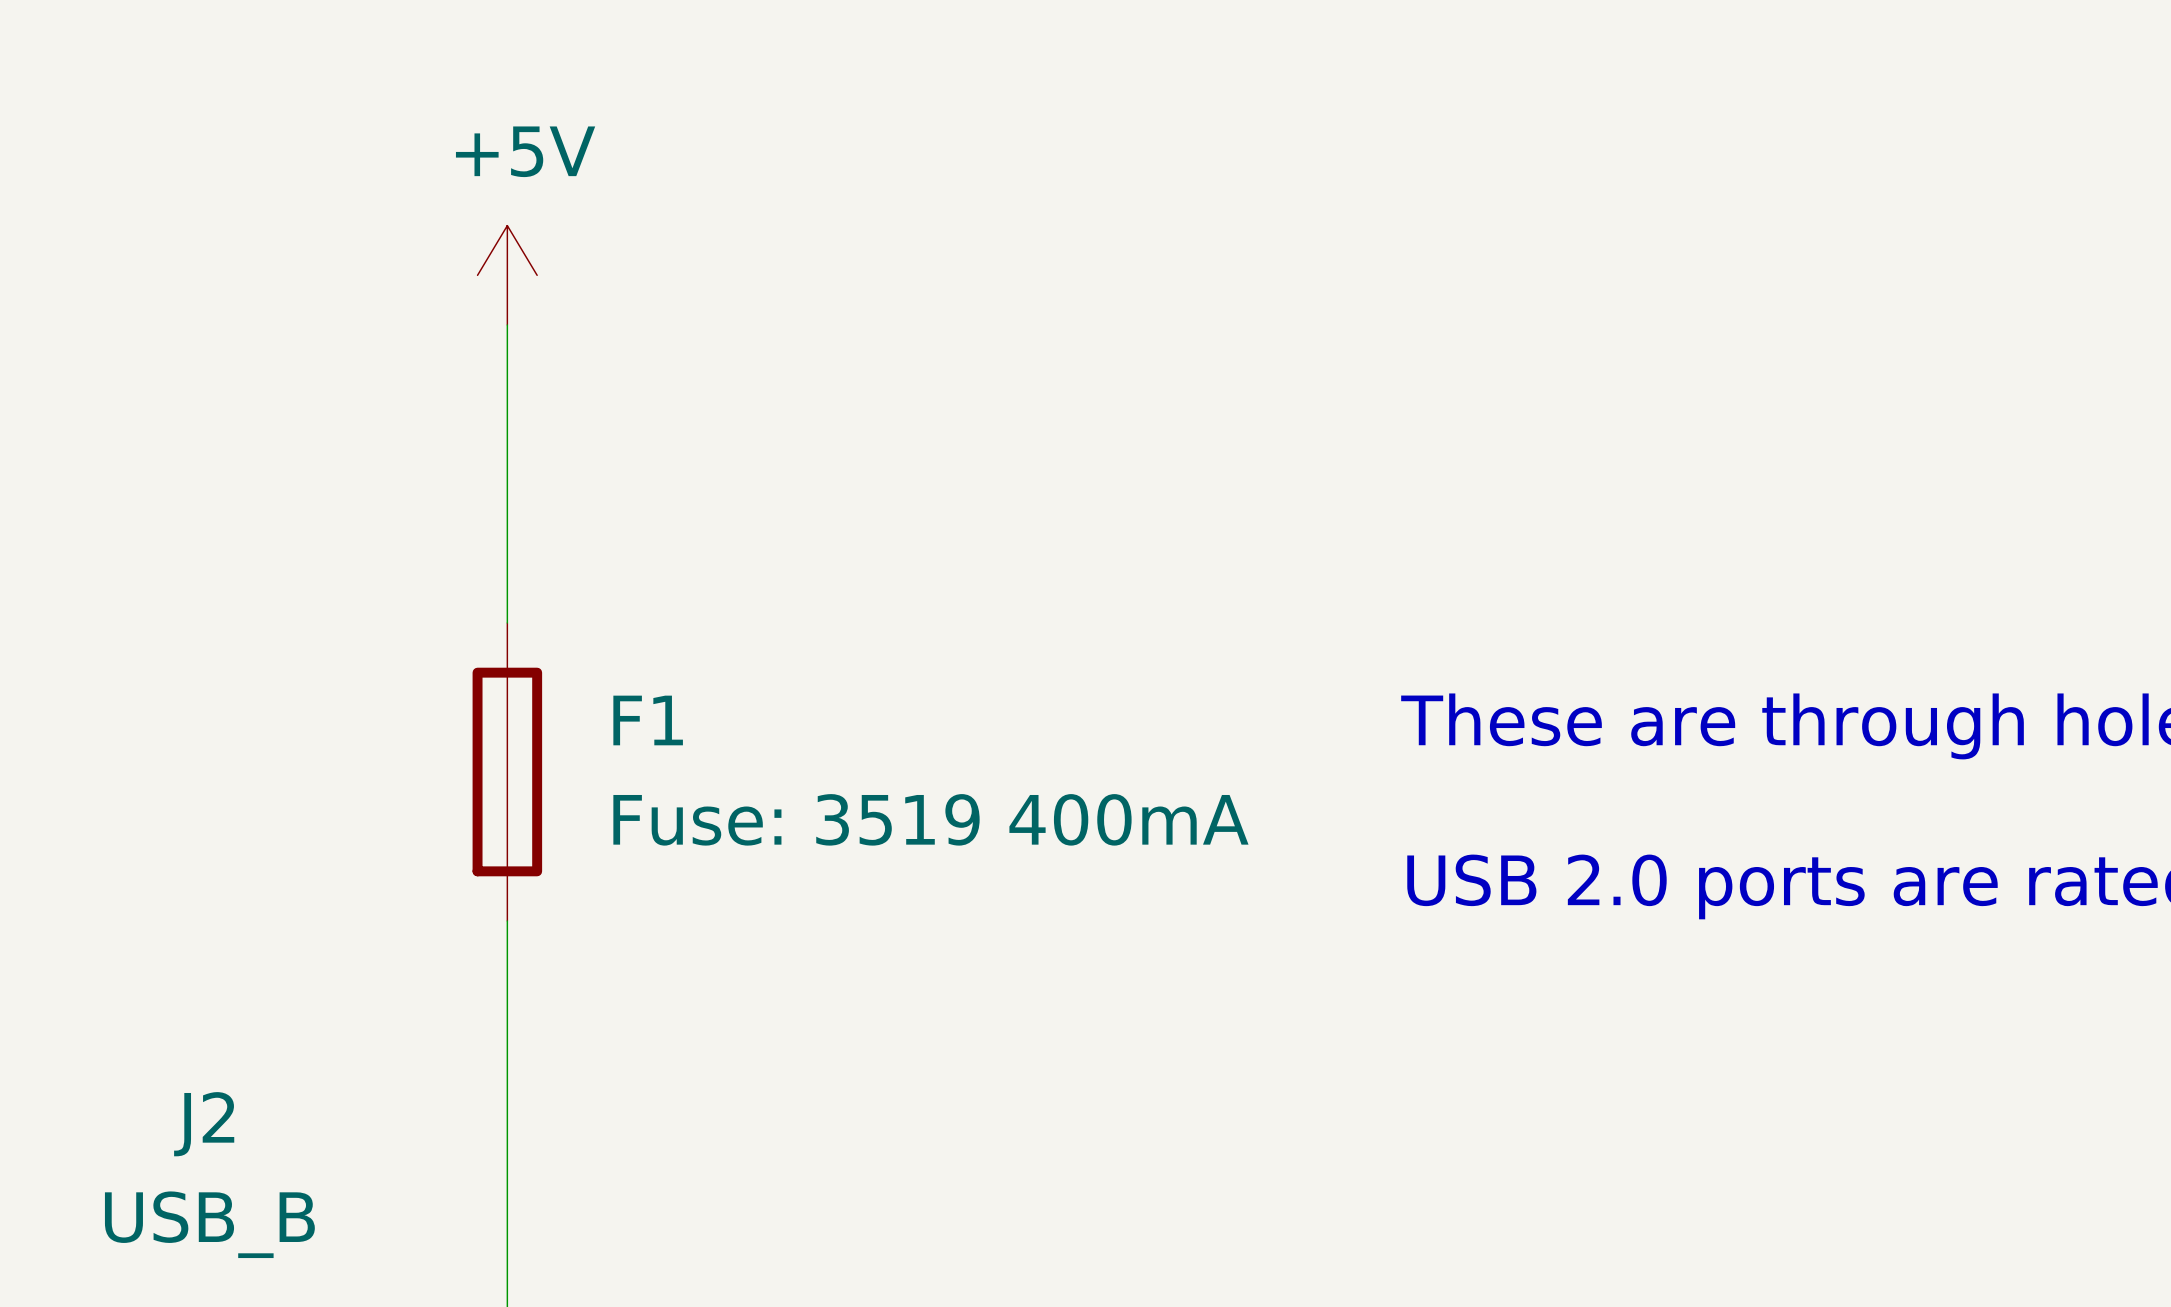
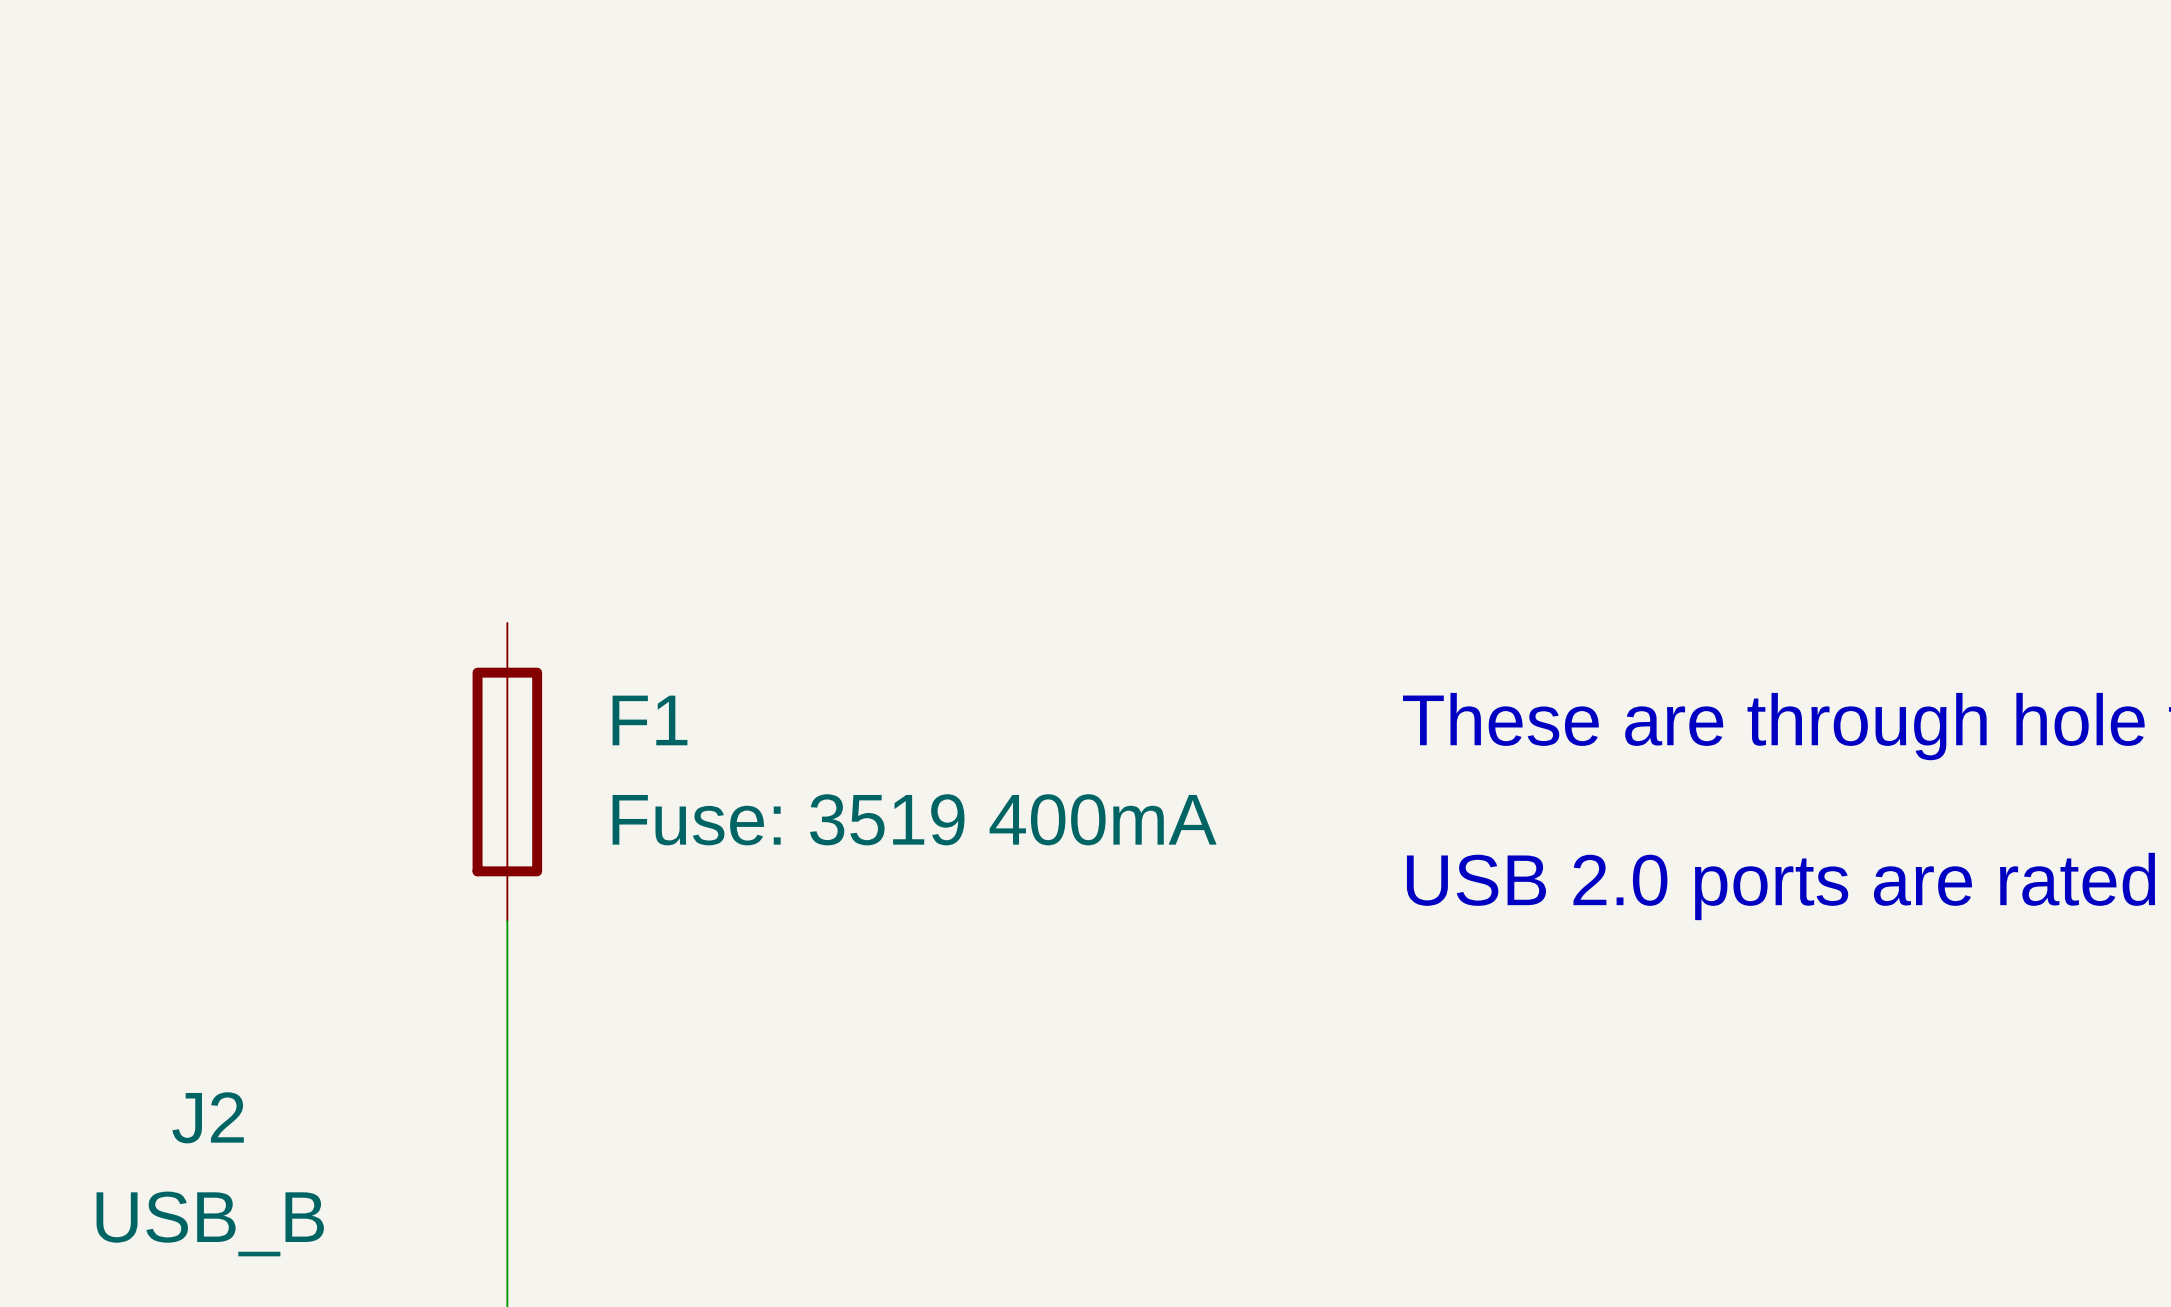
power symbol: +5V (507, 275) -> none
wire: (507, 324) (507, 623) -> none

